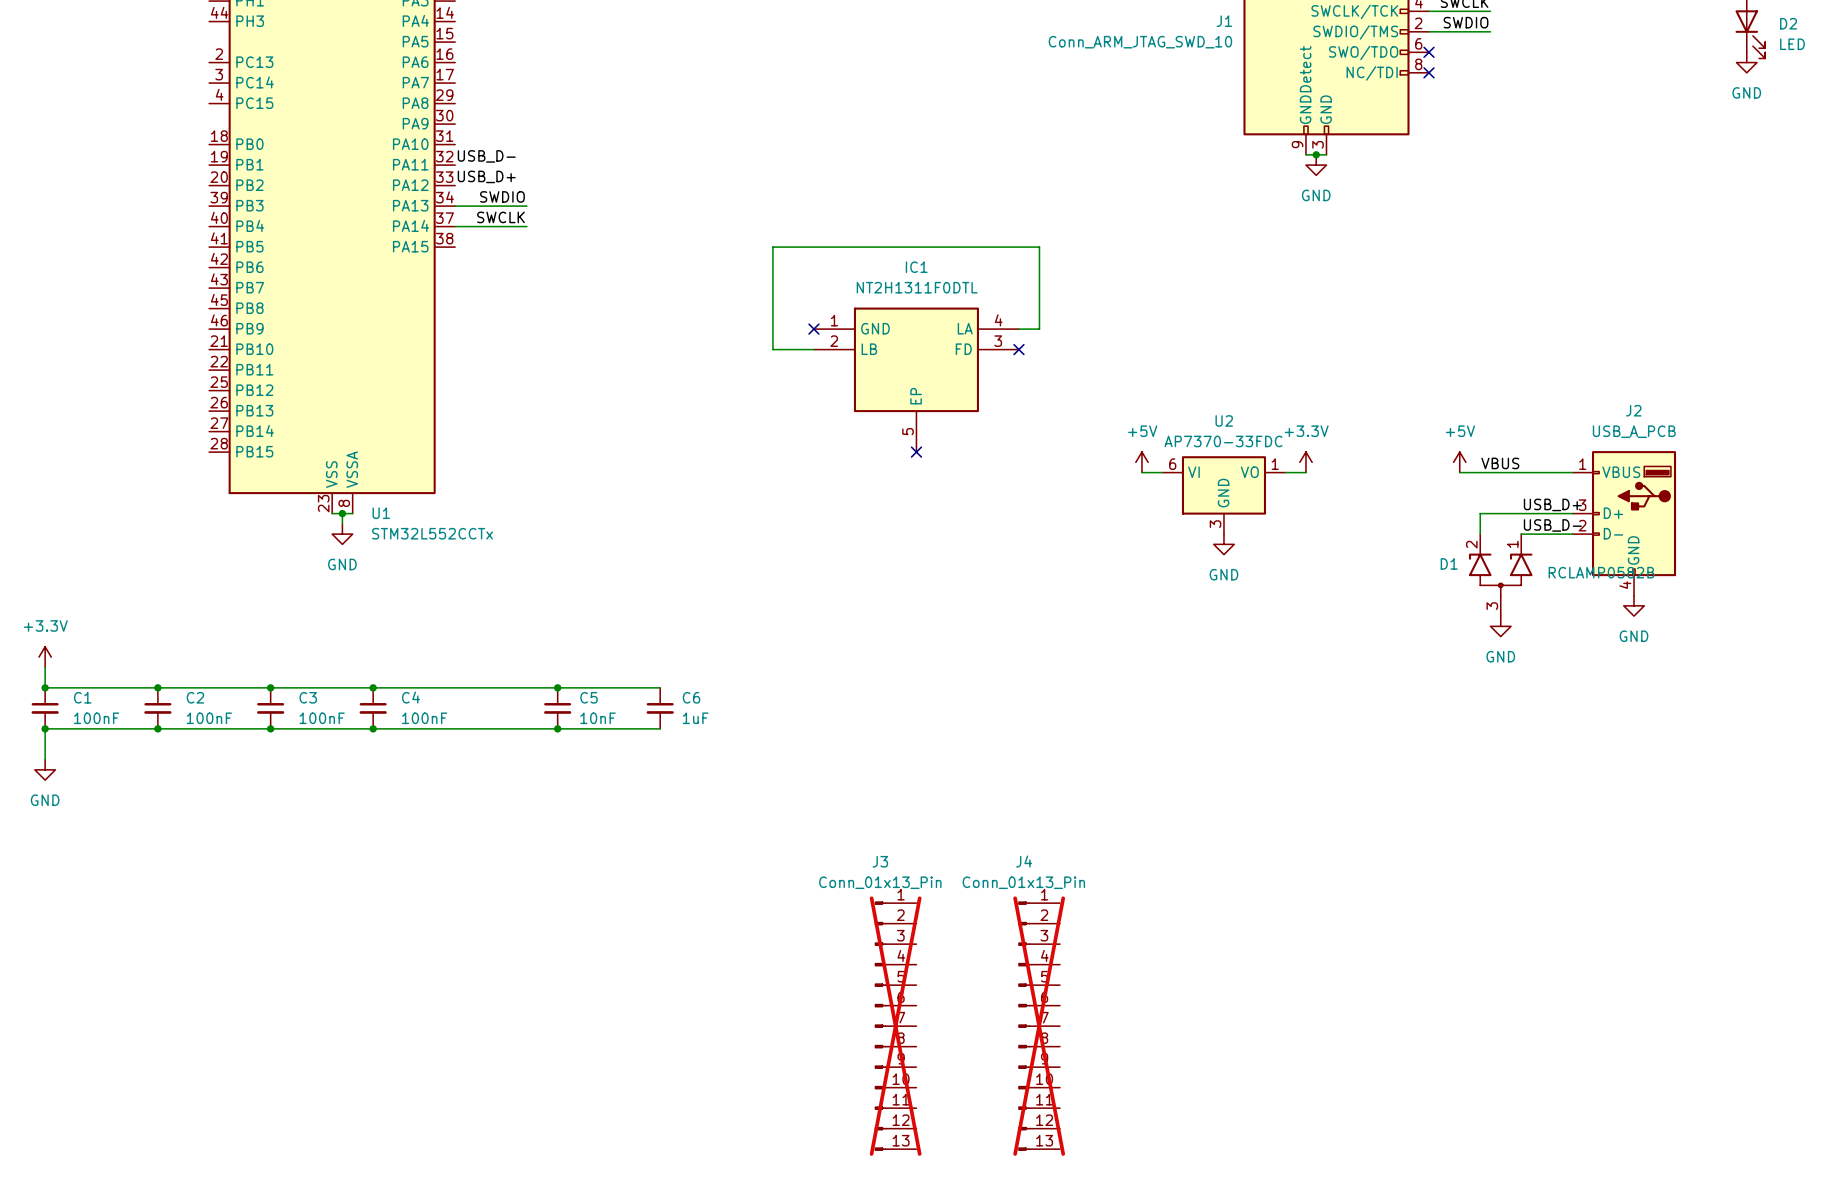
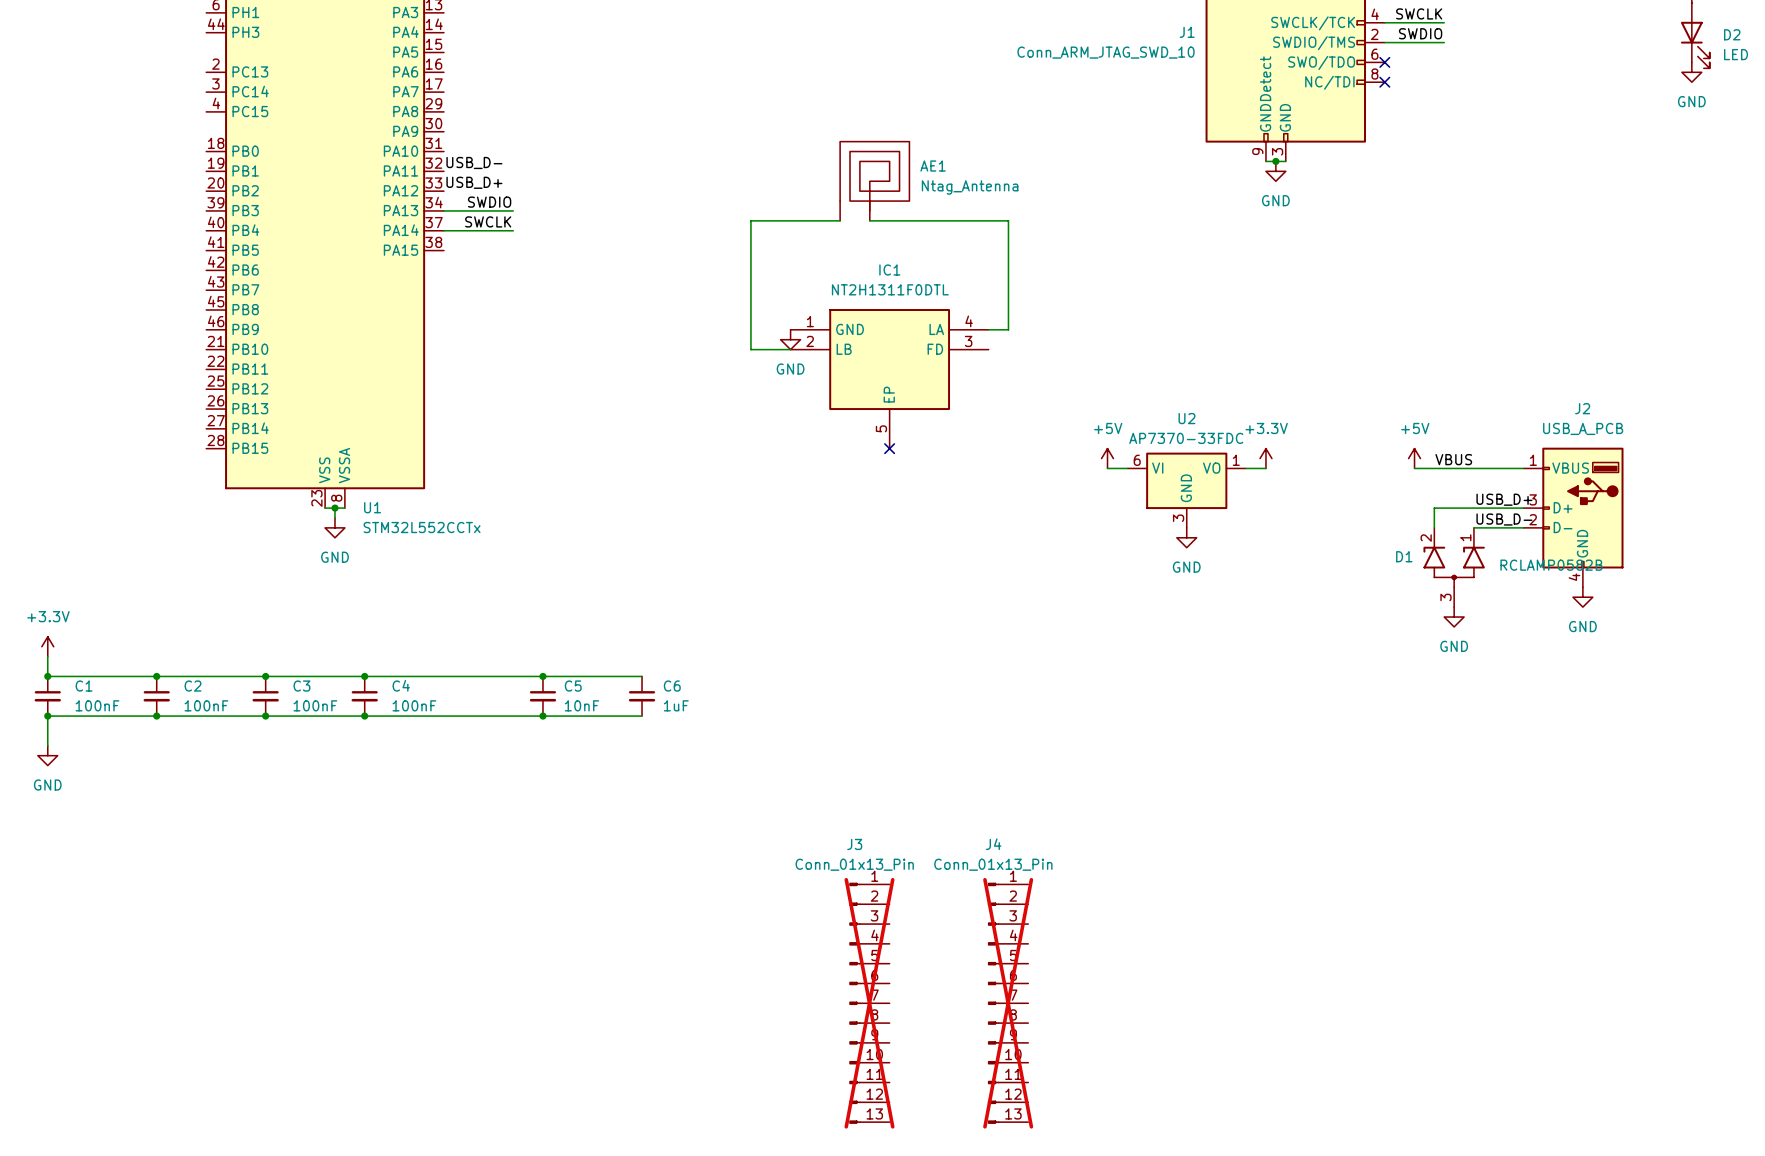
AE1: none -> Ntag_Antenna (874, 181)
wire: none -> (840, 220) (750, 220) (750, 250)
wire: (772, 247) (1039, 247) -> (869, 220) (1008, 220) (1008, 250)
no-connect mark: (813, 329) -> none
power symbol: none -> GND (790, 339)
no-connect mark: (1018, 349) -> none

